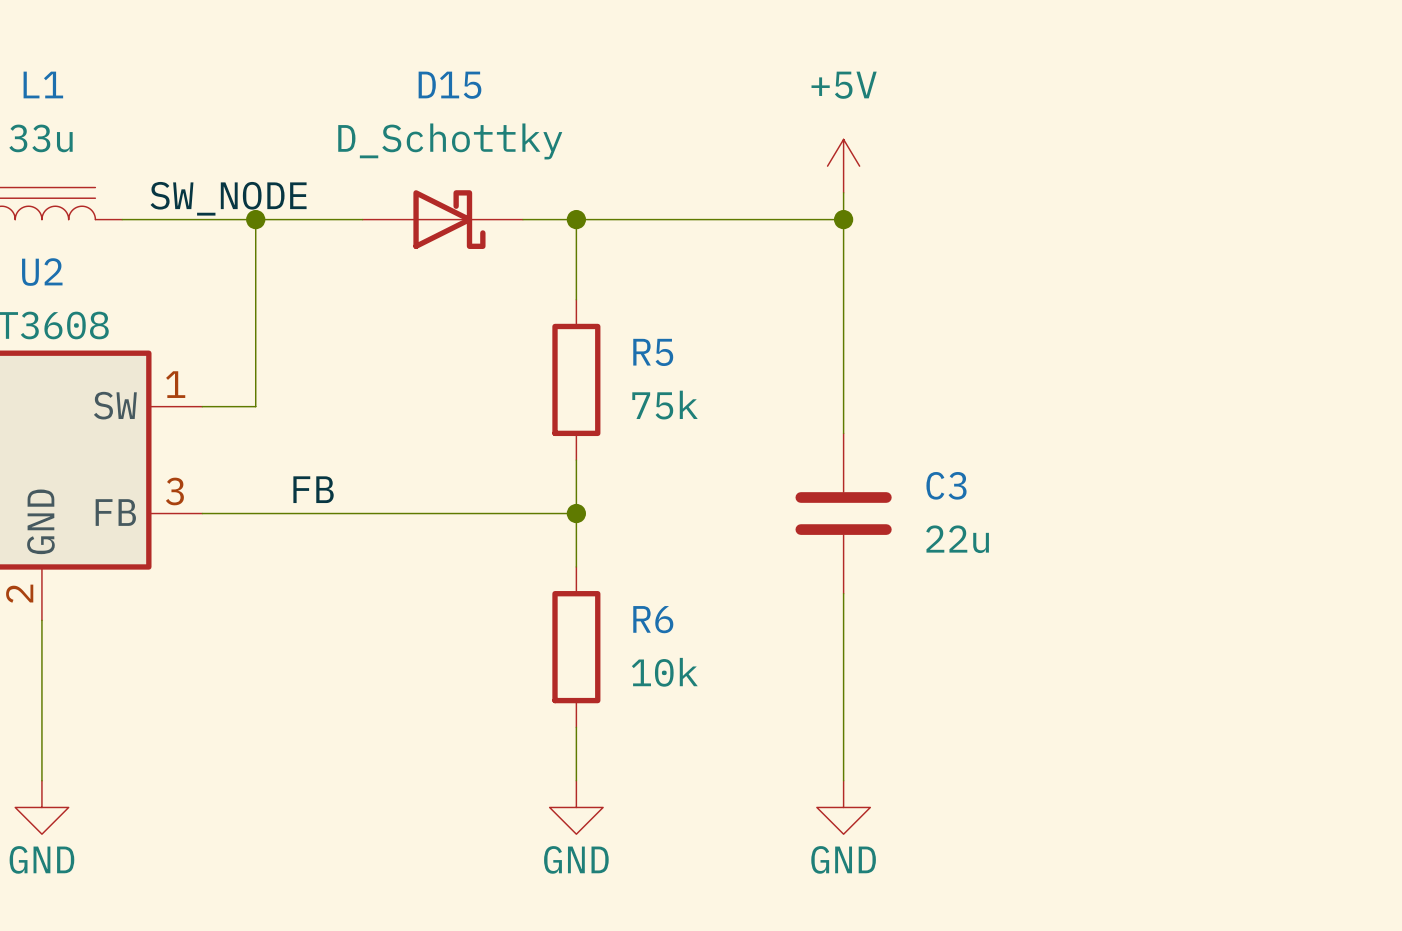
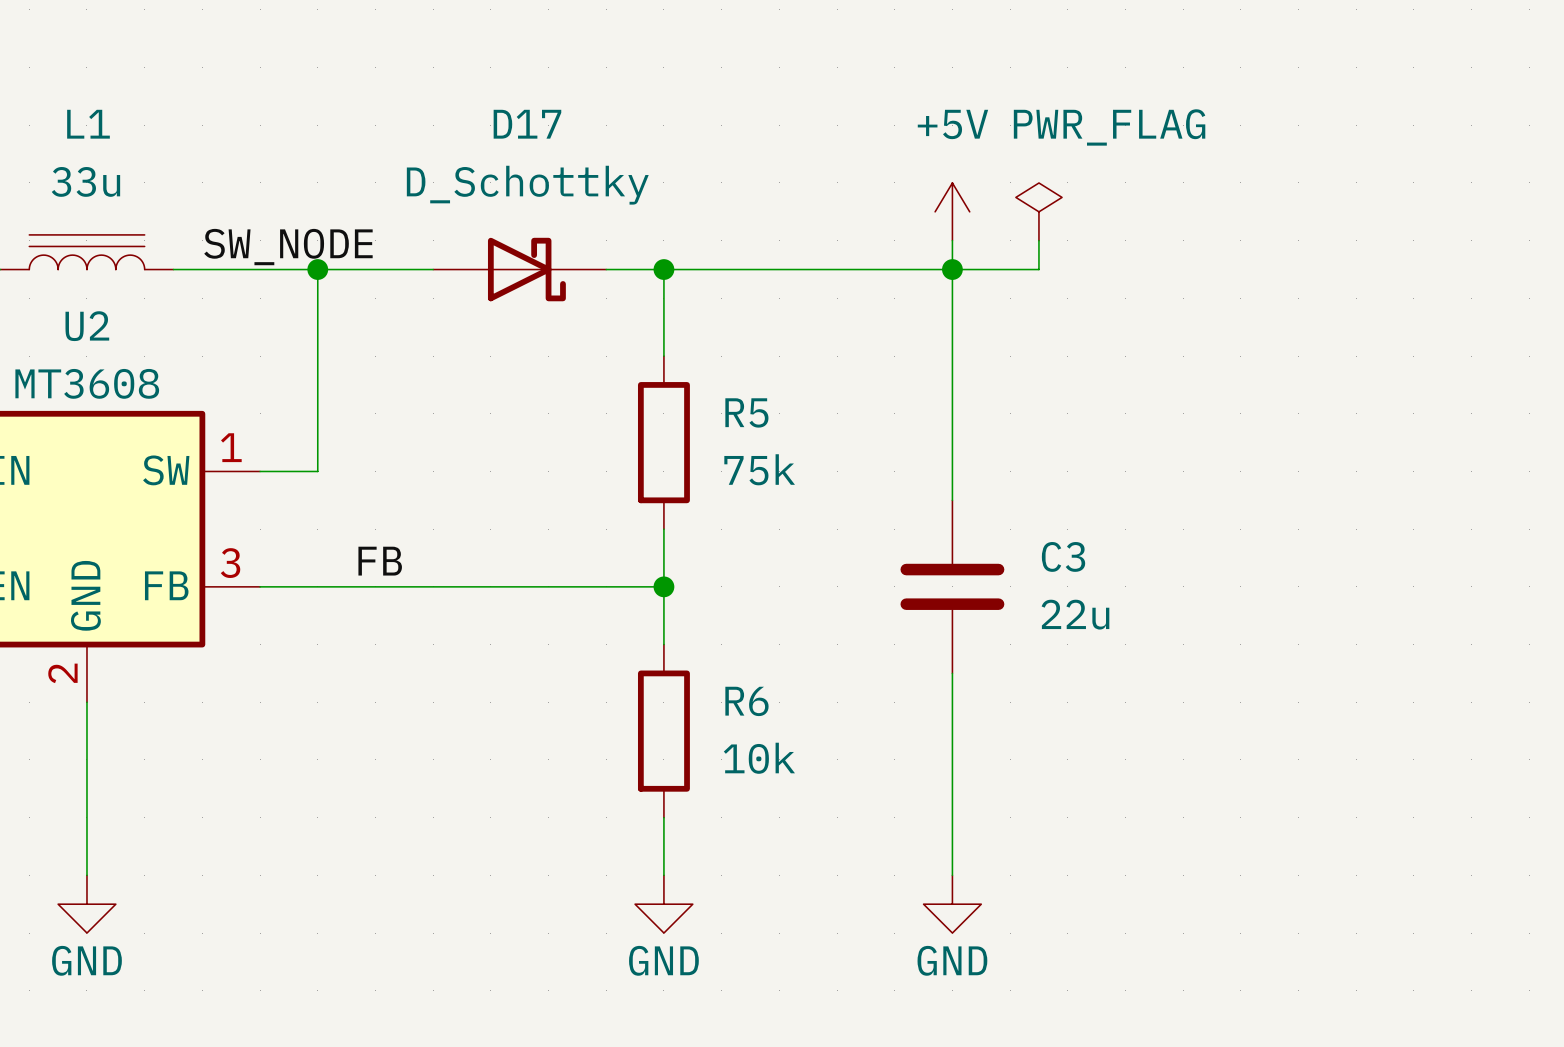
D15 name: D15 (449, 85) -> D17 (527, 124)
power symbol: none -> PWR_FLAG (1038, 211)
wire: none -> (1038, 240) (1038, 269) (952, 269)

